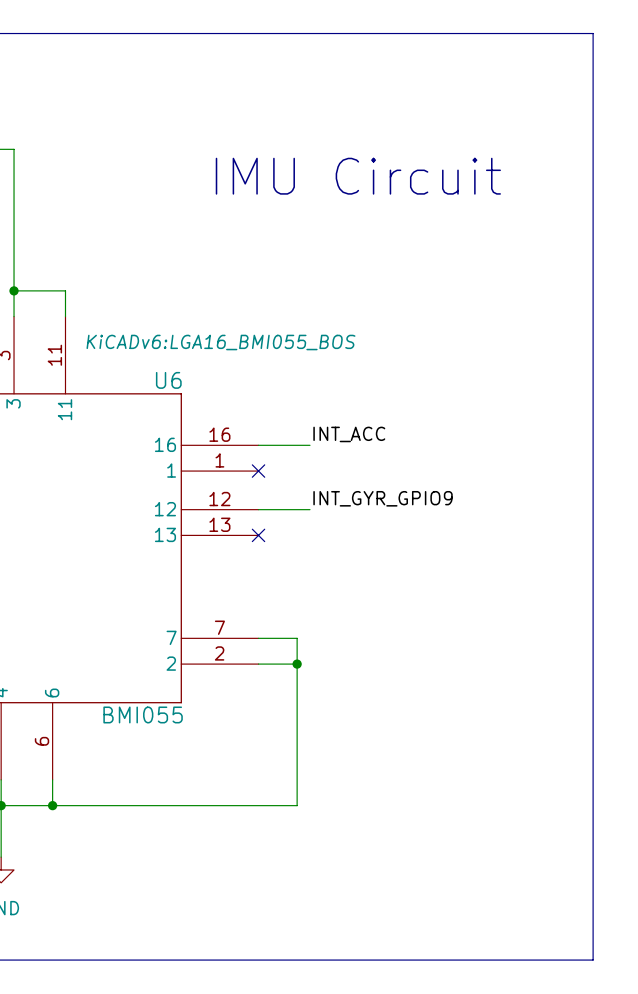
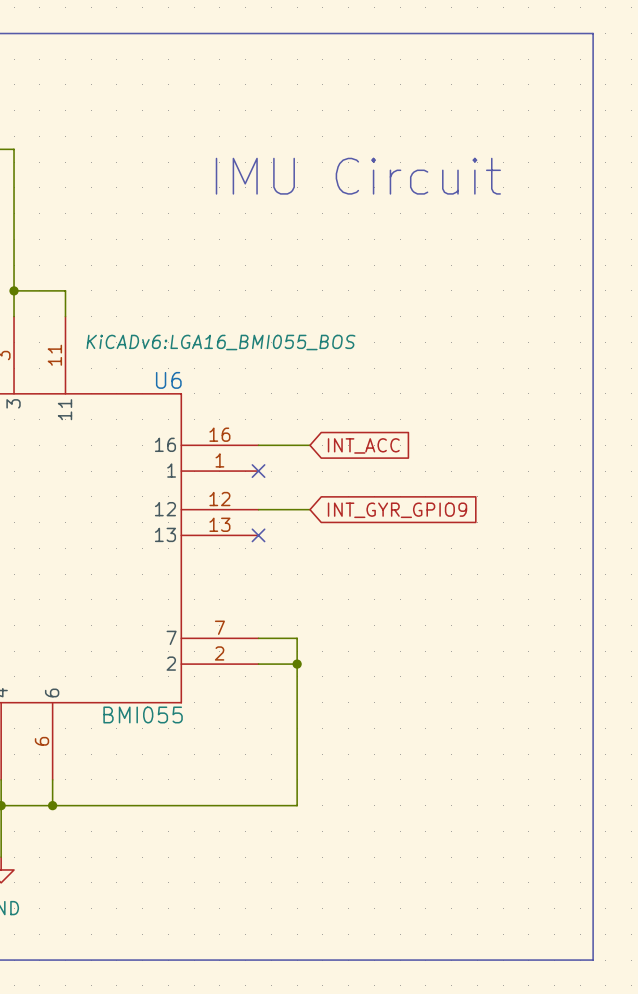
label: INT_ACC (349, 434) -> none
global label: none -> INT_ACC (363, 445)
label: INT_GYR_GPIO9 (383, 498) -> none
global label: none -> INT_GYR_GPIO9 (397, 510)

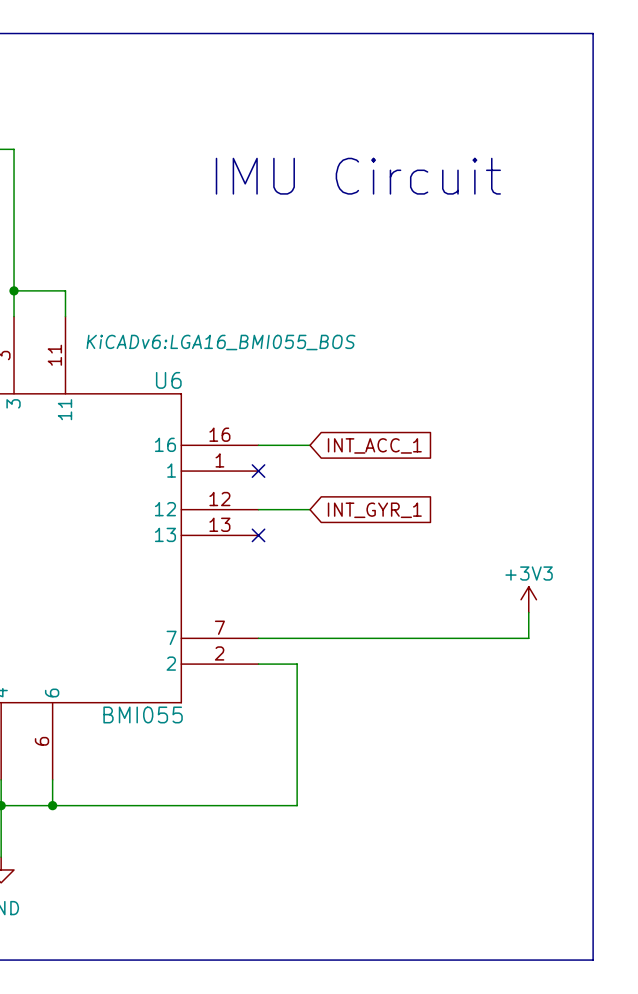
global label: INT_ACC (363, 445) -> INT_ACC_1 (374, 445)
global label: INT_GYR_GPIO9 (397, 510) -> INT_GYR_1 (374, 510)
power symbol: none -> +3V3 (528, 599)
wire: (297, 638) (297, 664) -> (297, 638) (528, 638) (528, 612)
junction: (297, 664) -> none

